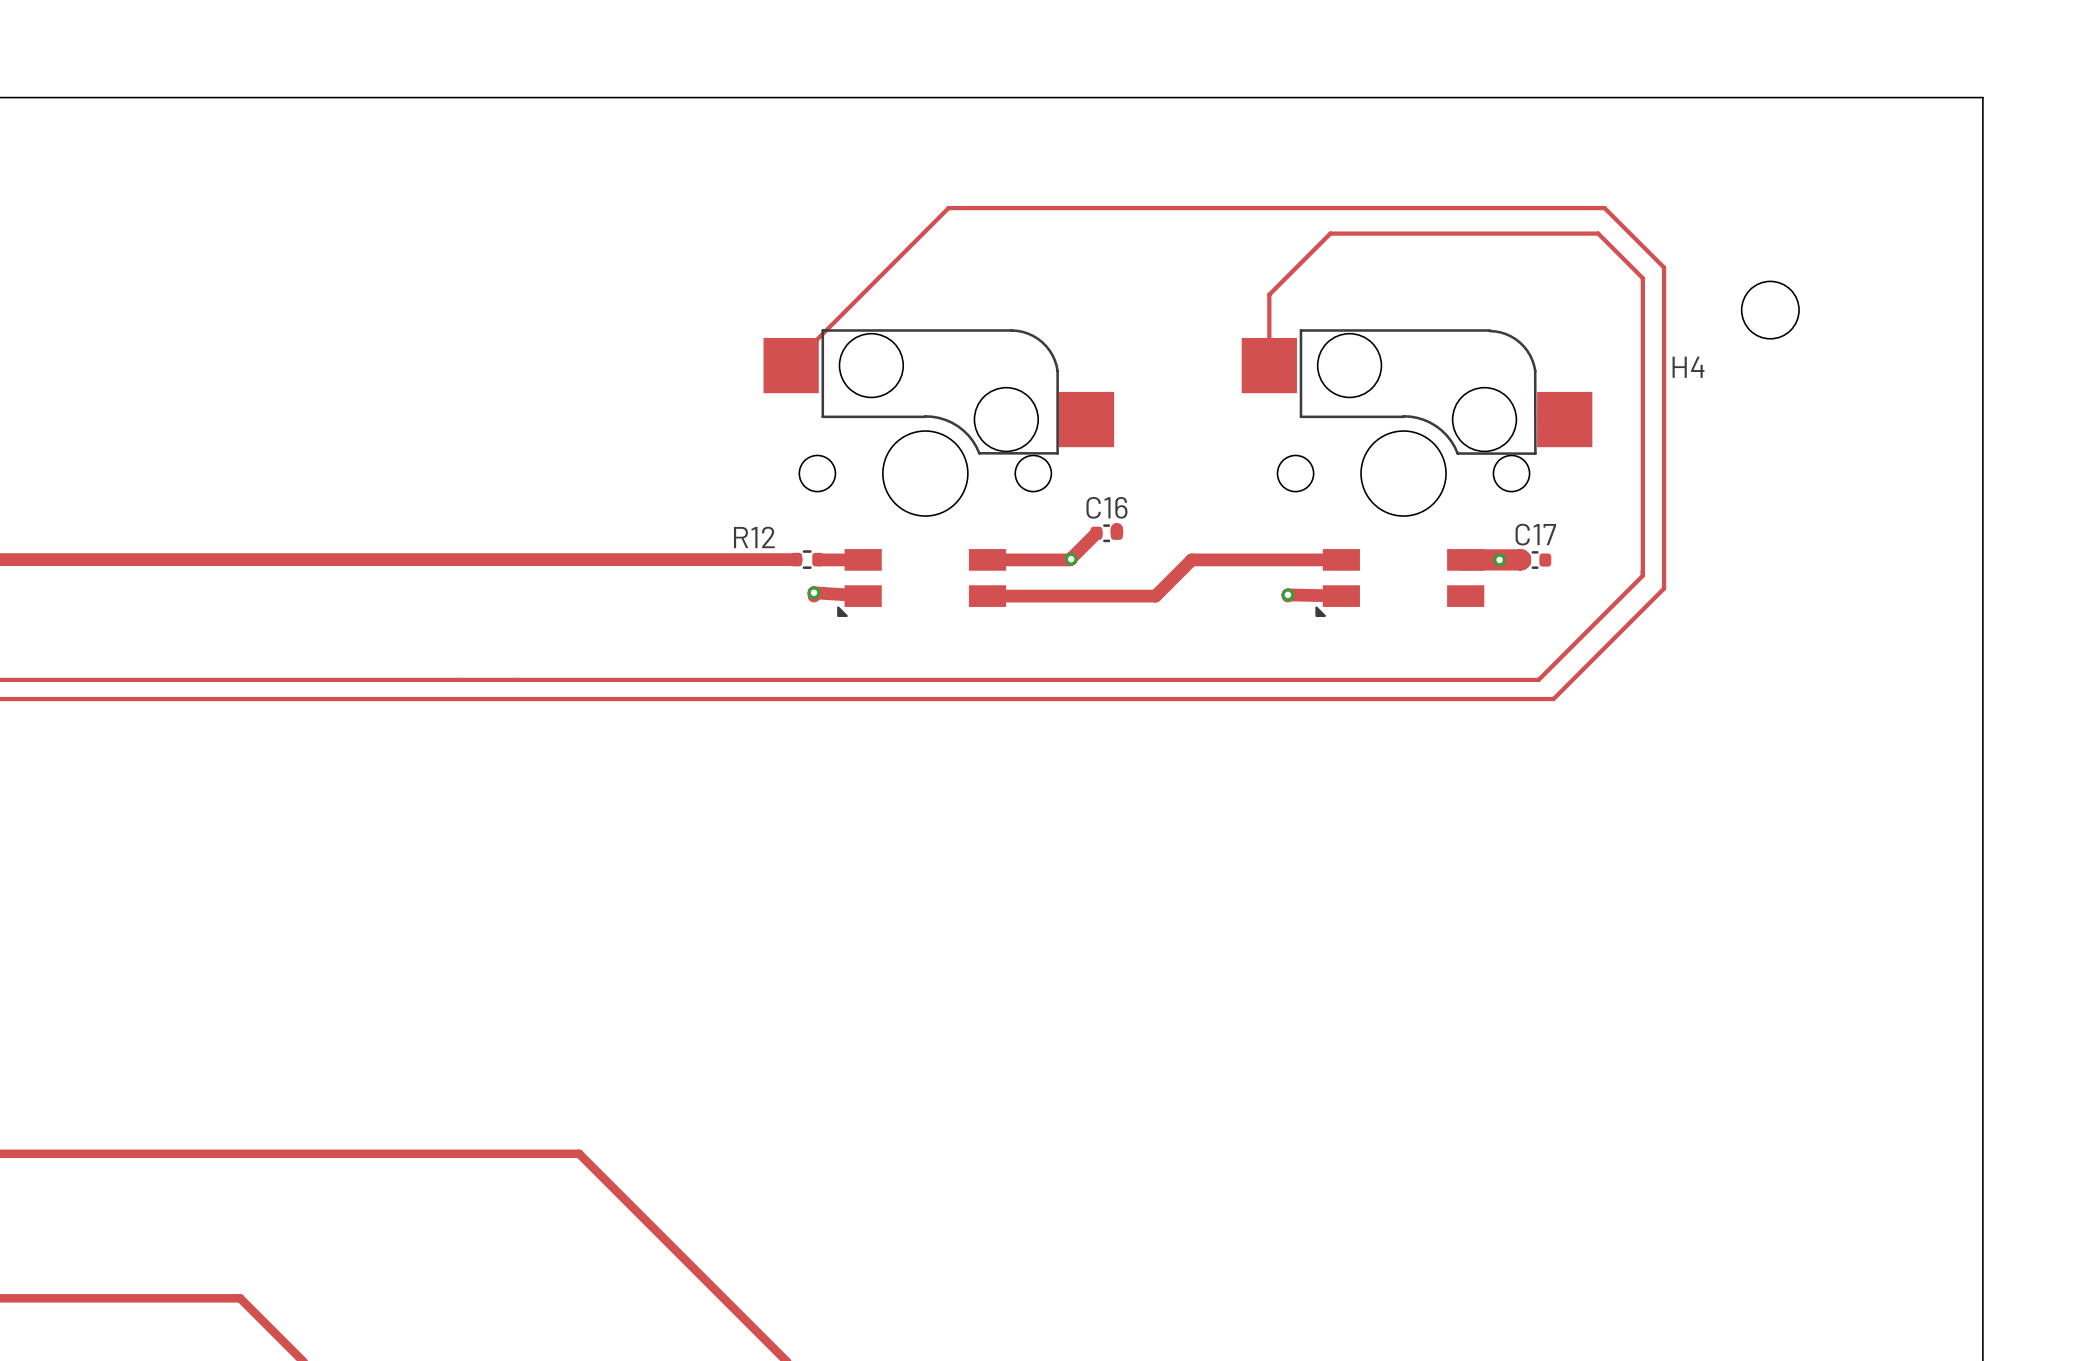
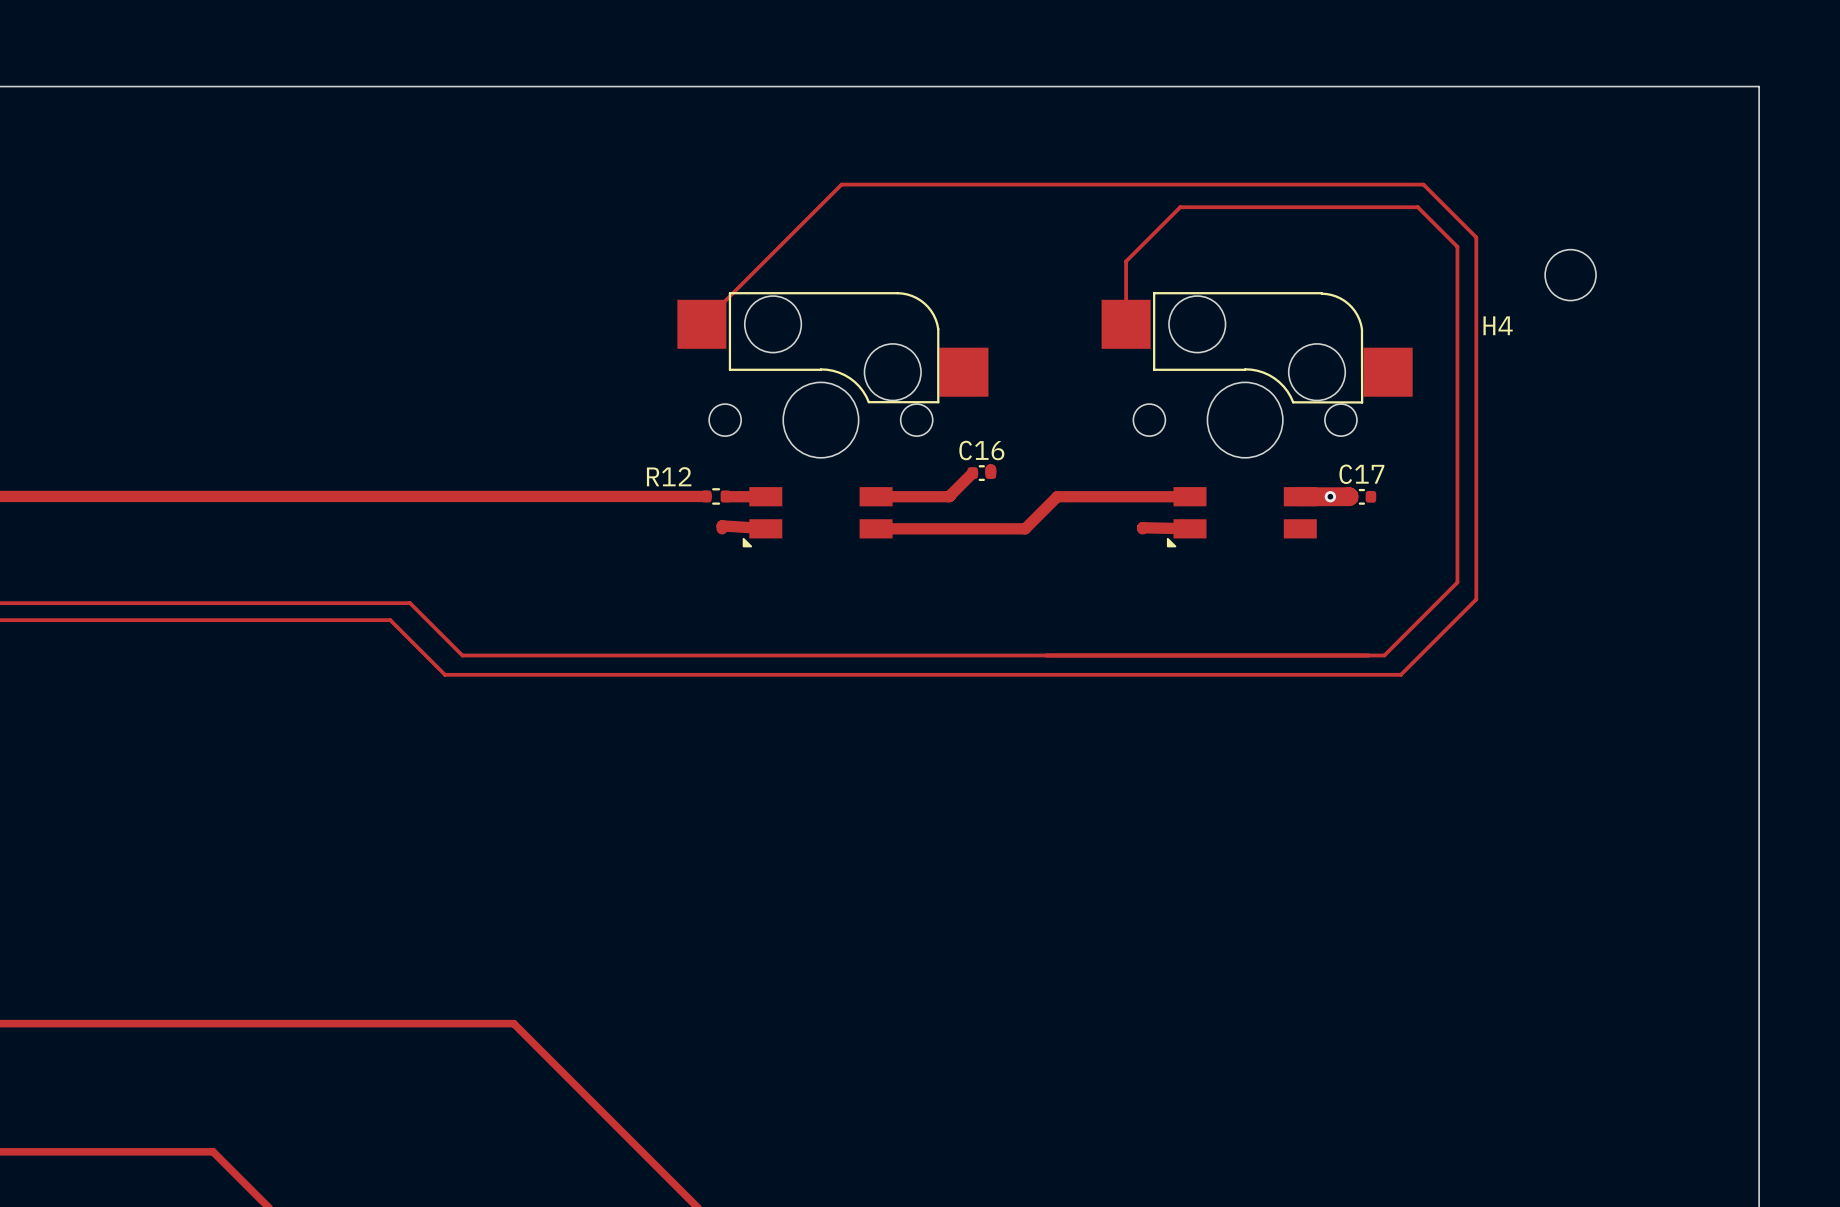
via: (1071, 559) -> none
top track: (1642, 575) (1538, 679) (462, 679) -> (1457, 510) (1457, 582) (1384, 655) (462, 655) (410, 603)
top track: (1664, 588) (1553, 699) (439, 699) -> (1476, 522) (1476, 599) (1400, 674) (444, 674) (390, 620)
via: (813, 592) -> none
via: (1287, 594) -> none

